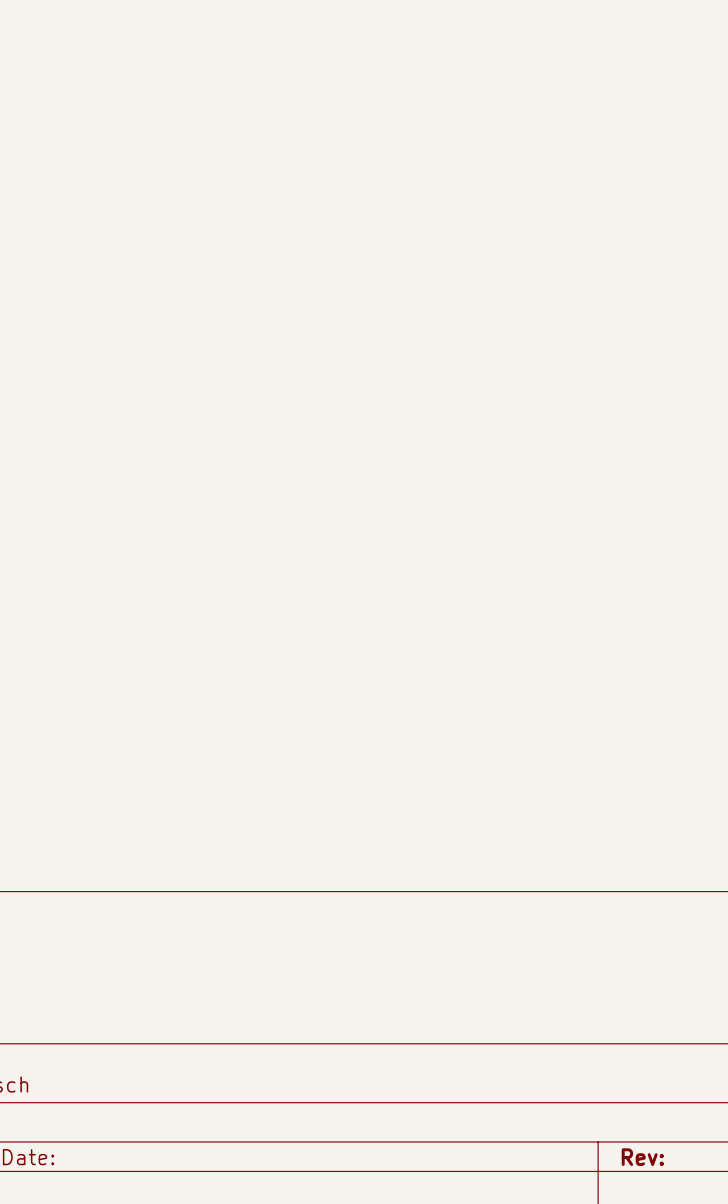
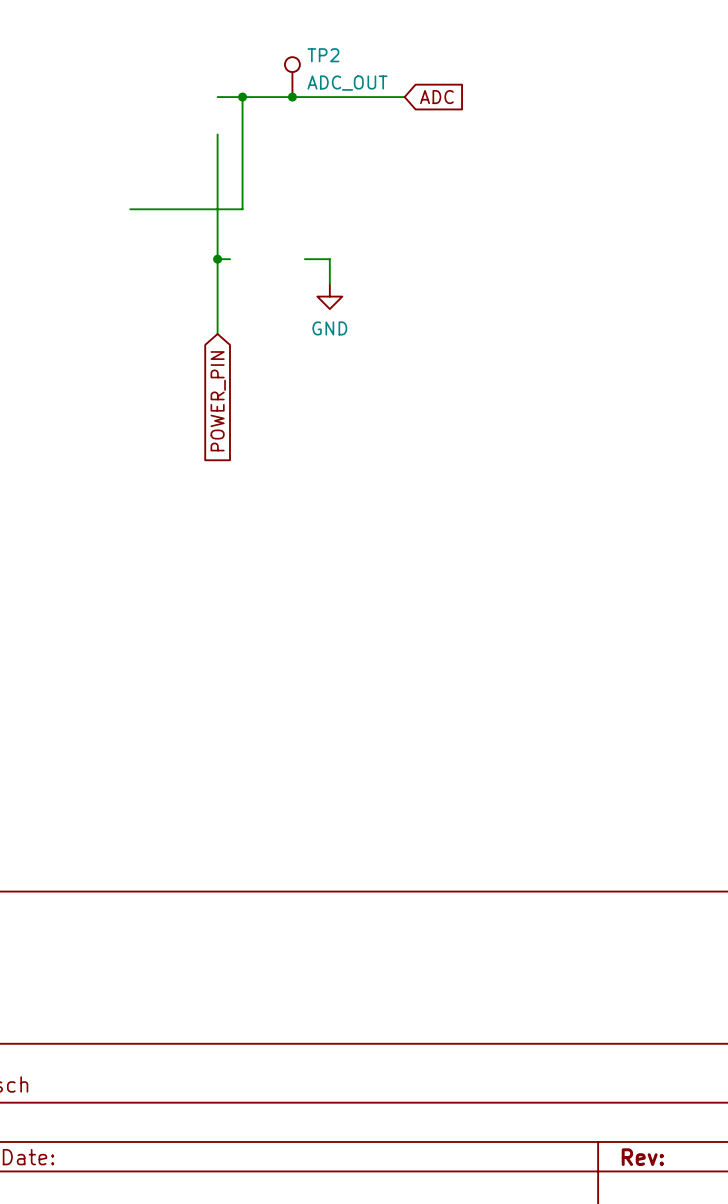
TP2: none -> ADC_OUT (292, 77)
wire: none -> (217, 97) (404, 97)
wire: none -> (242, 97) (242, 209) (130, 209)
junction: none -> (242, 97)
junction: none -> (292, 97)
global label: none -> ADC (436, 97)
wire: none -> (217, 134) (217, 334)
wire: none -> (217, 259) (230, 259)
junction: none -> (217, 259)
wire: none -> (304, 259) (329, 259) (329, 284)
power symbol: none -> GND (329, 296)
global label: none -> POWER_PIN (218, 401)

